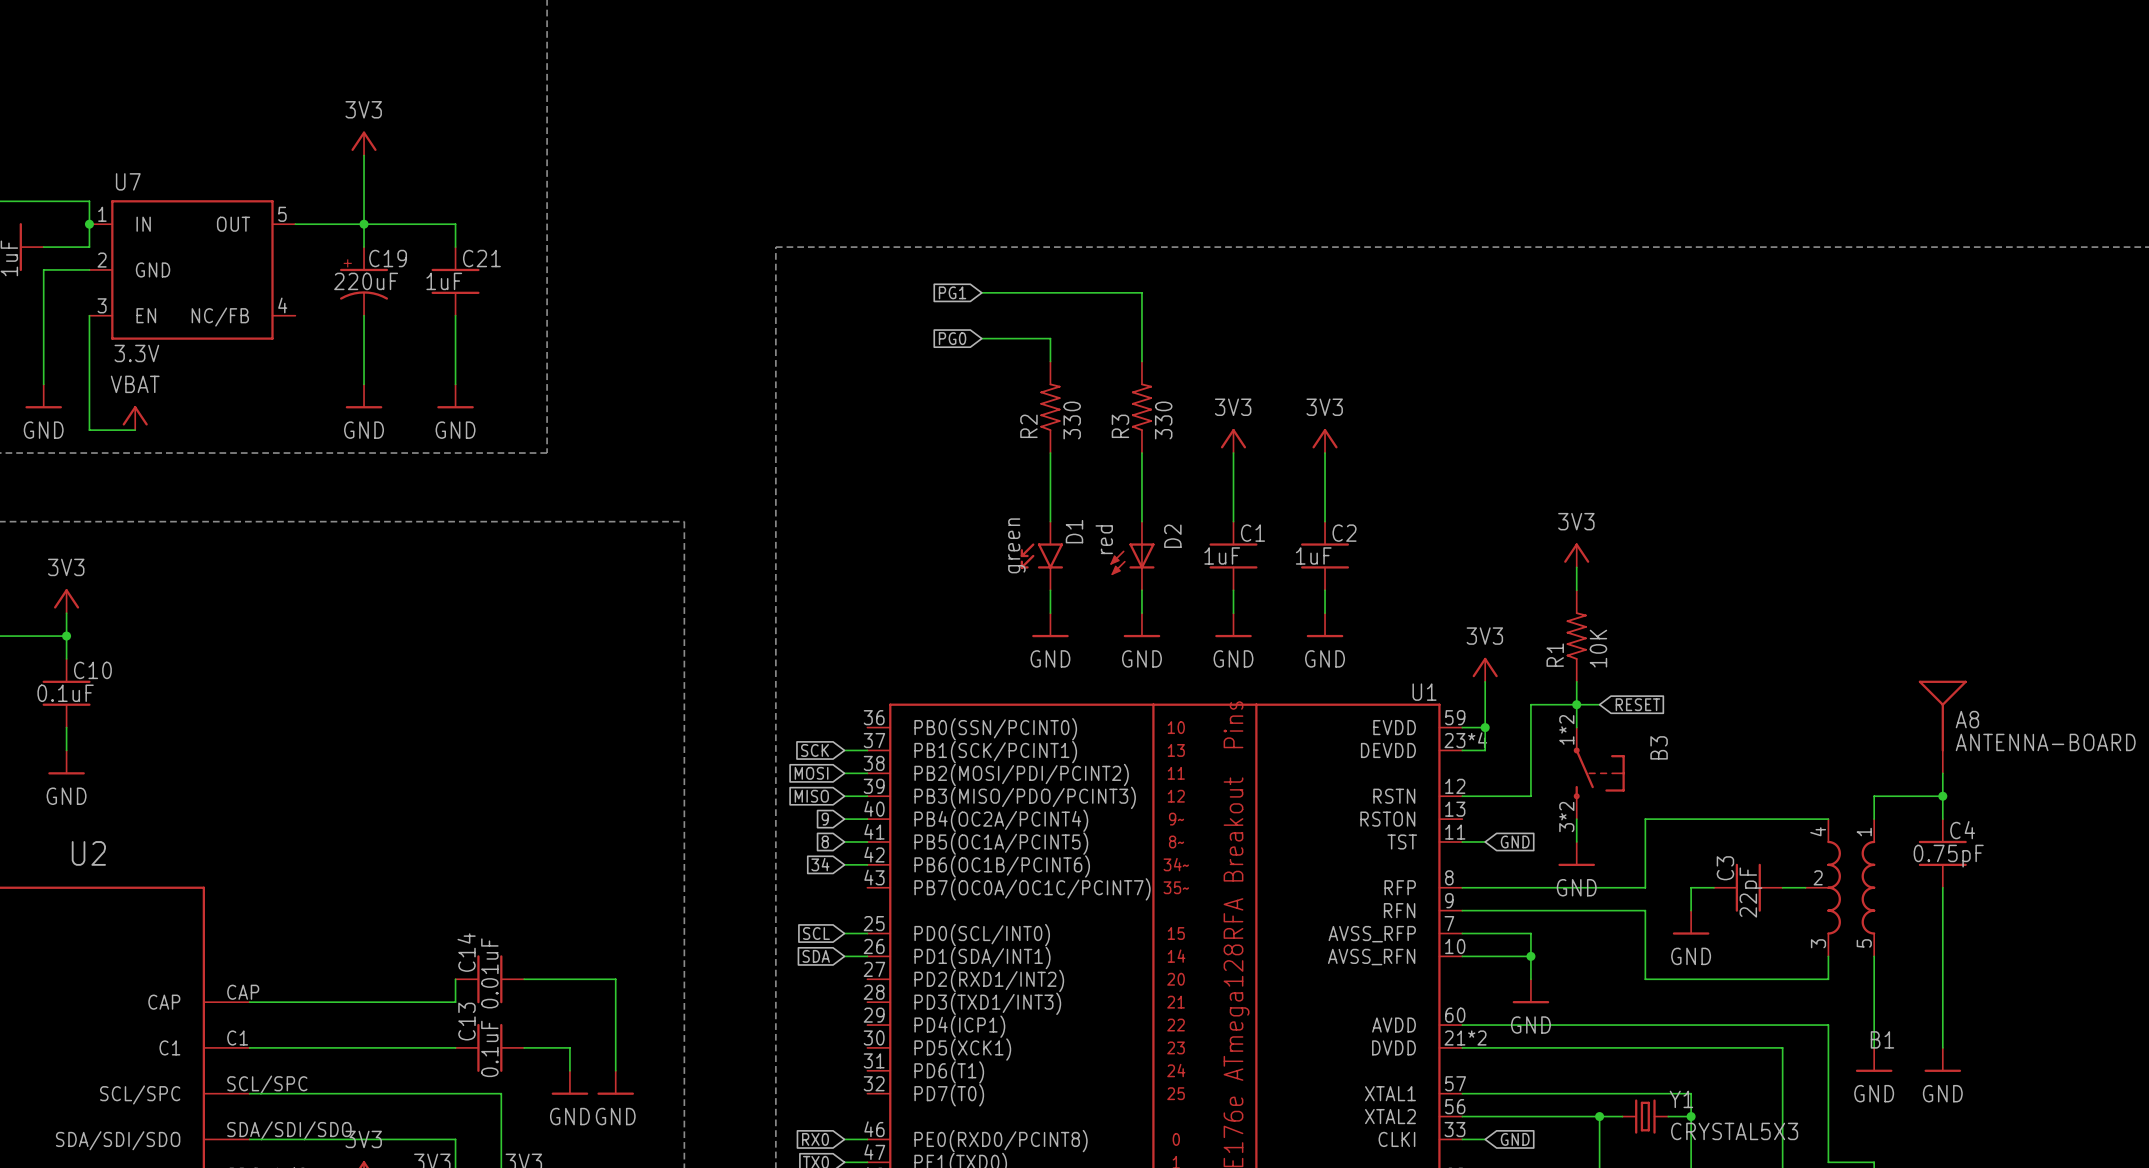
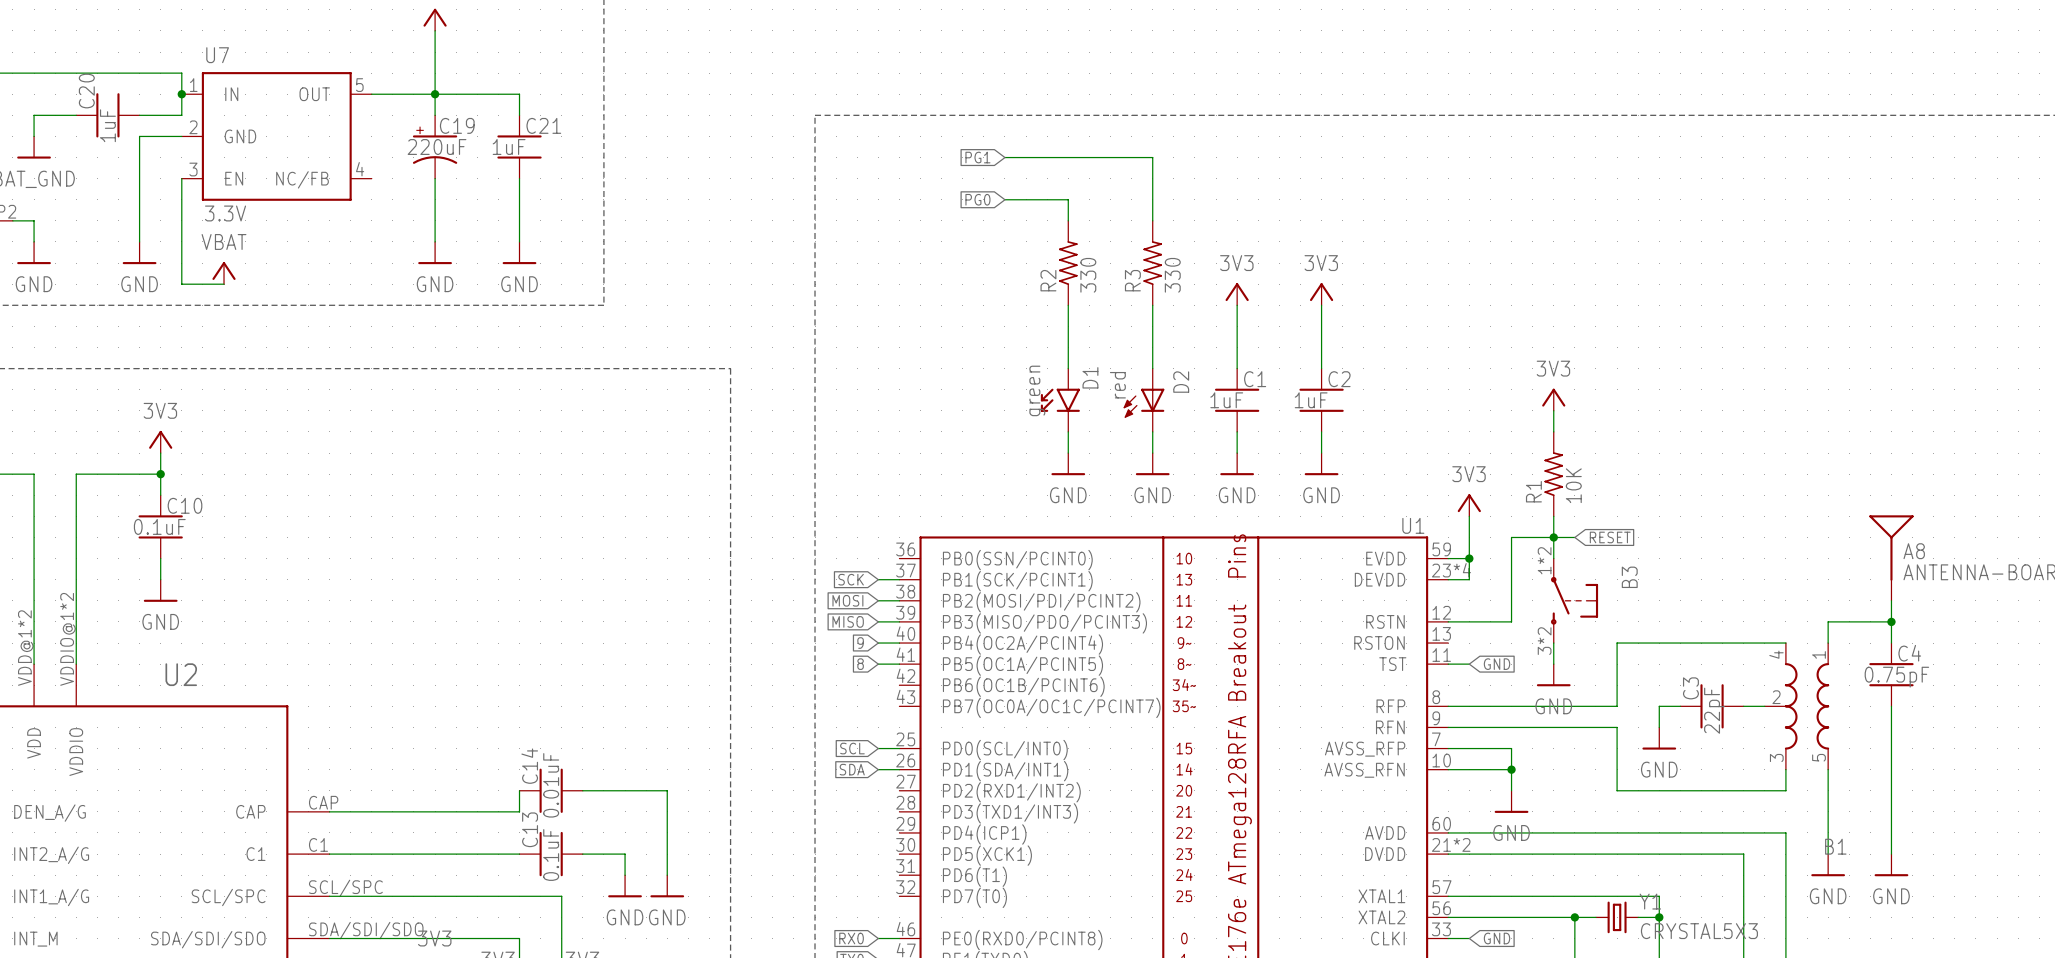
global label: 34 (820, 864) -> none
wire: (844, 864) (867, 864) -> none

